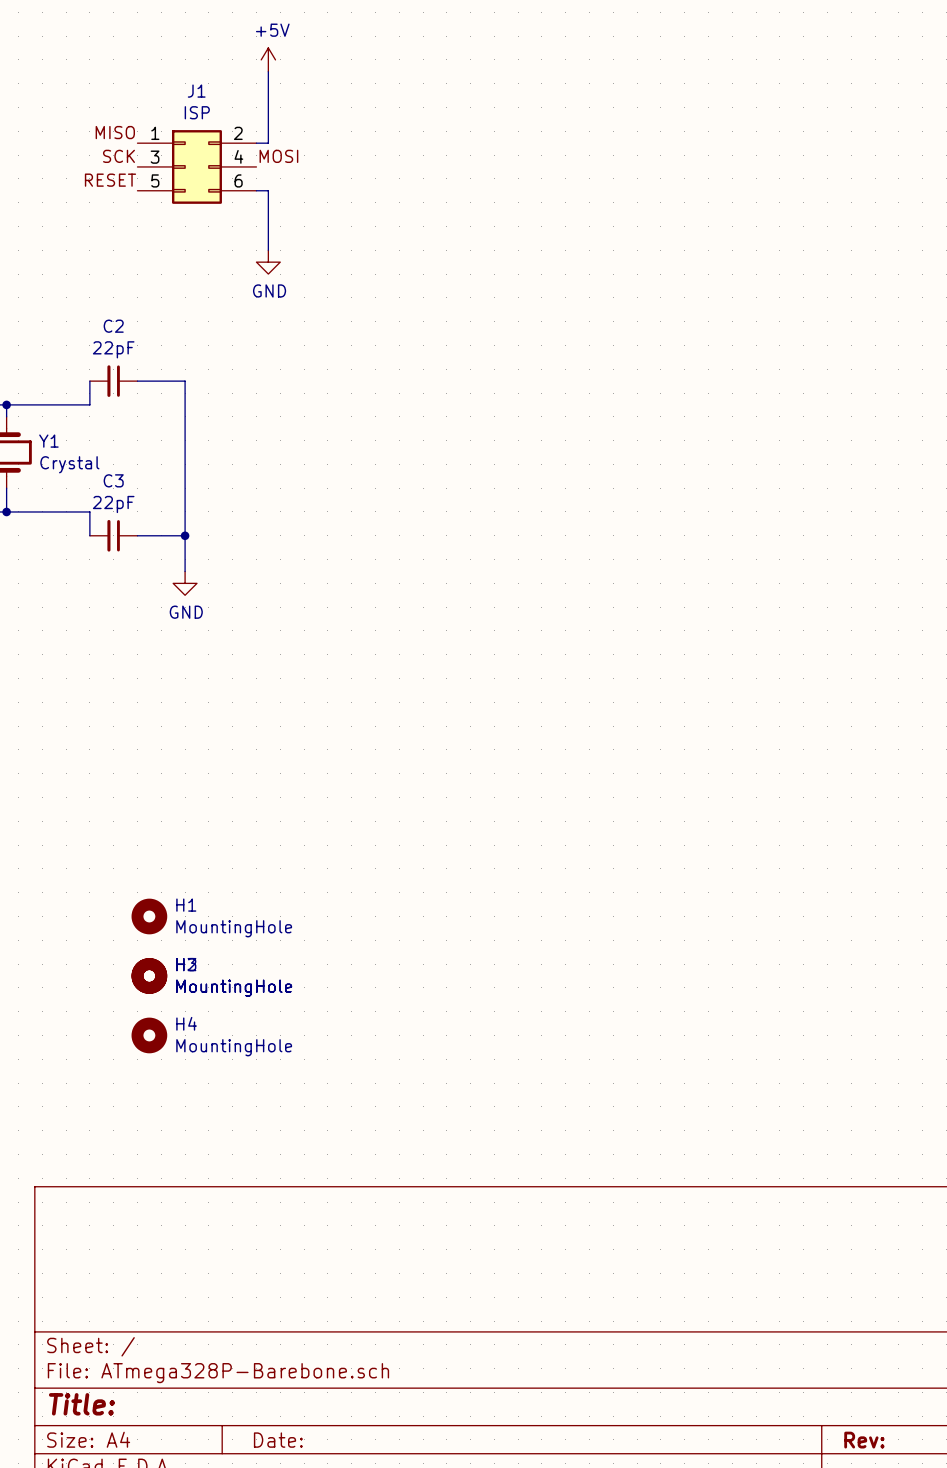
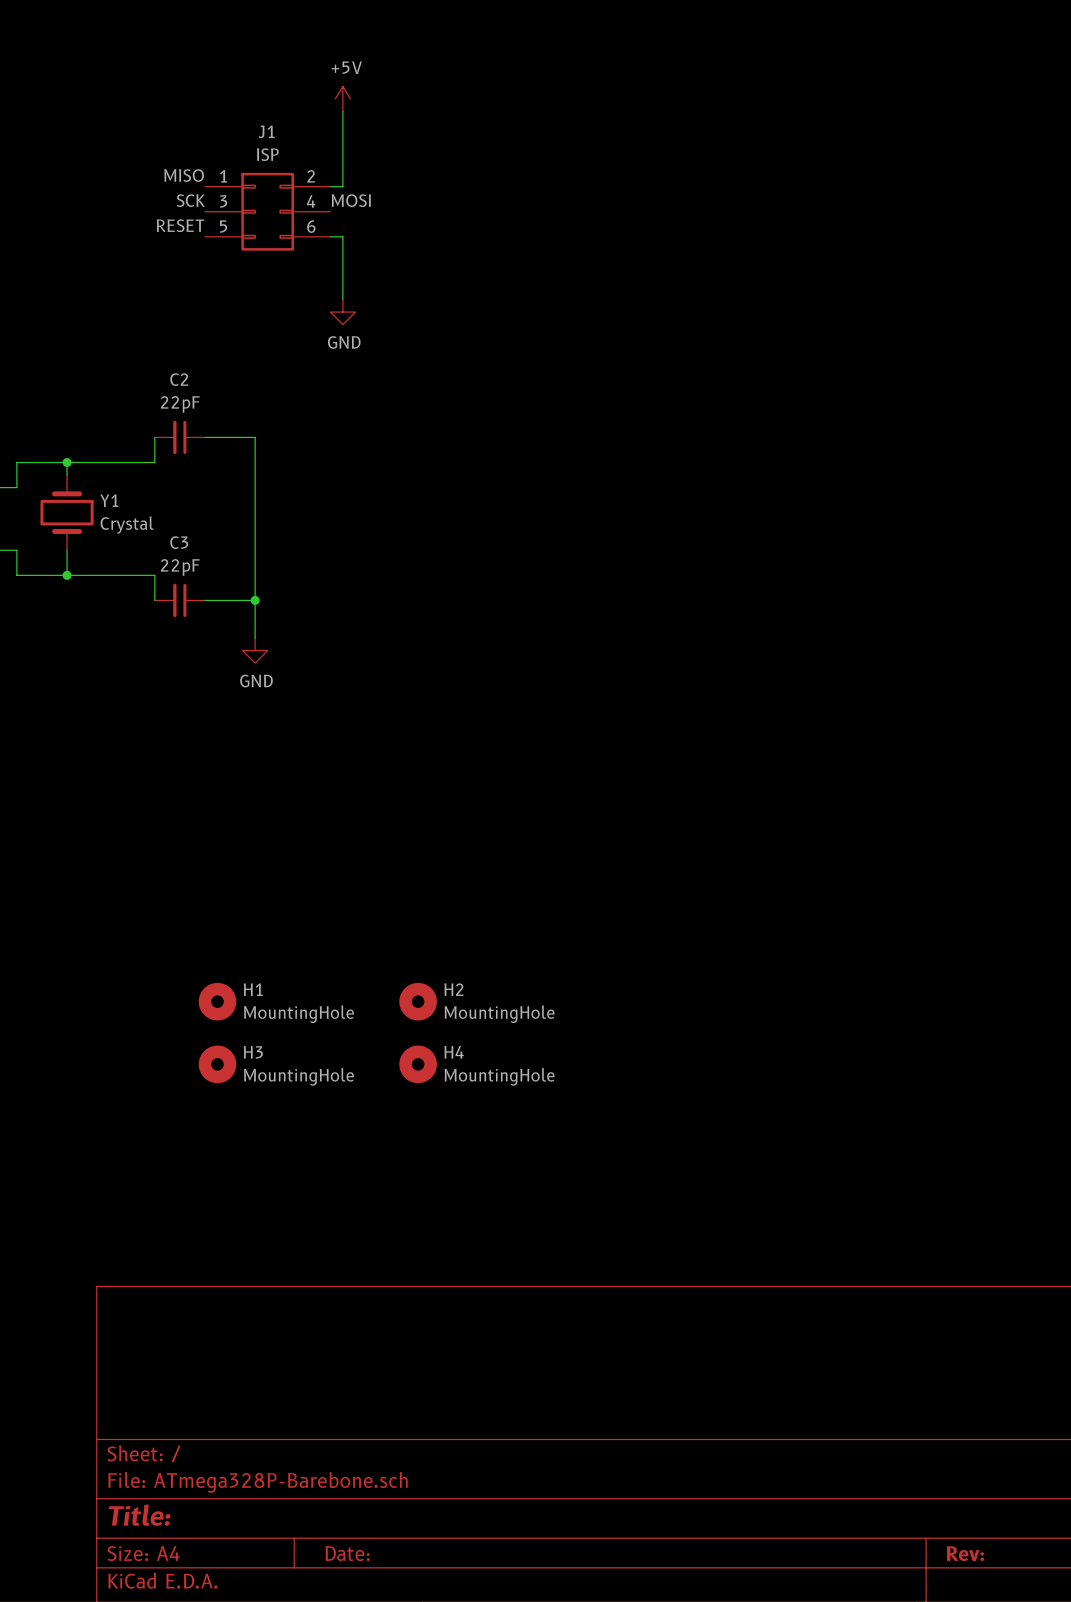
H2 position: (149, 975) -> (418, 1001)
H4 position: (149, 1035) -> (418, 1064)

